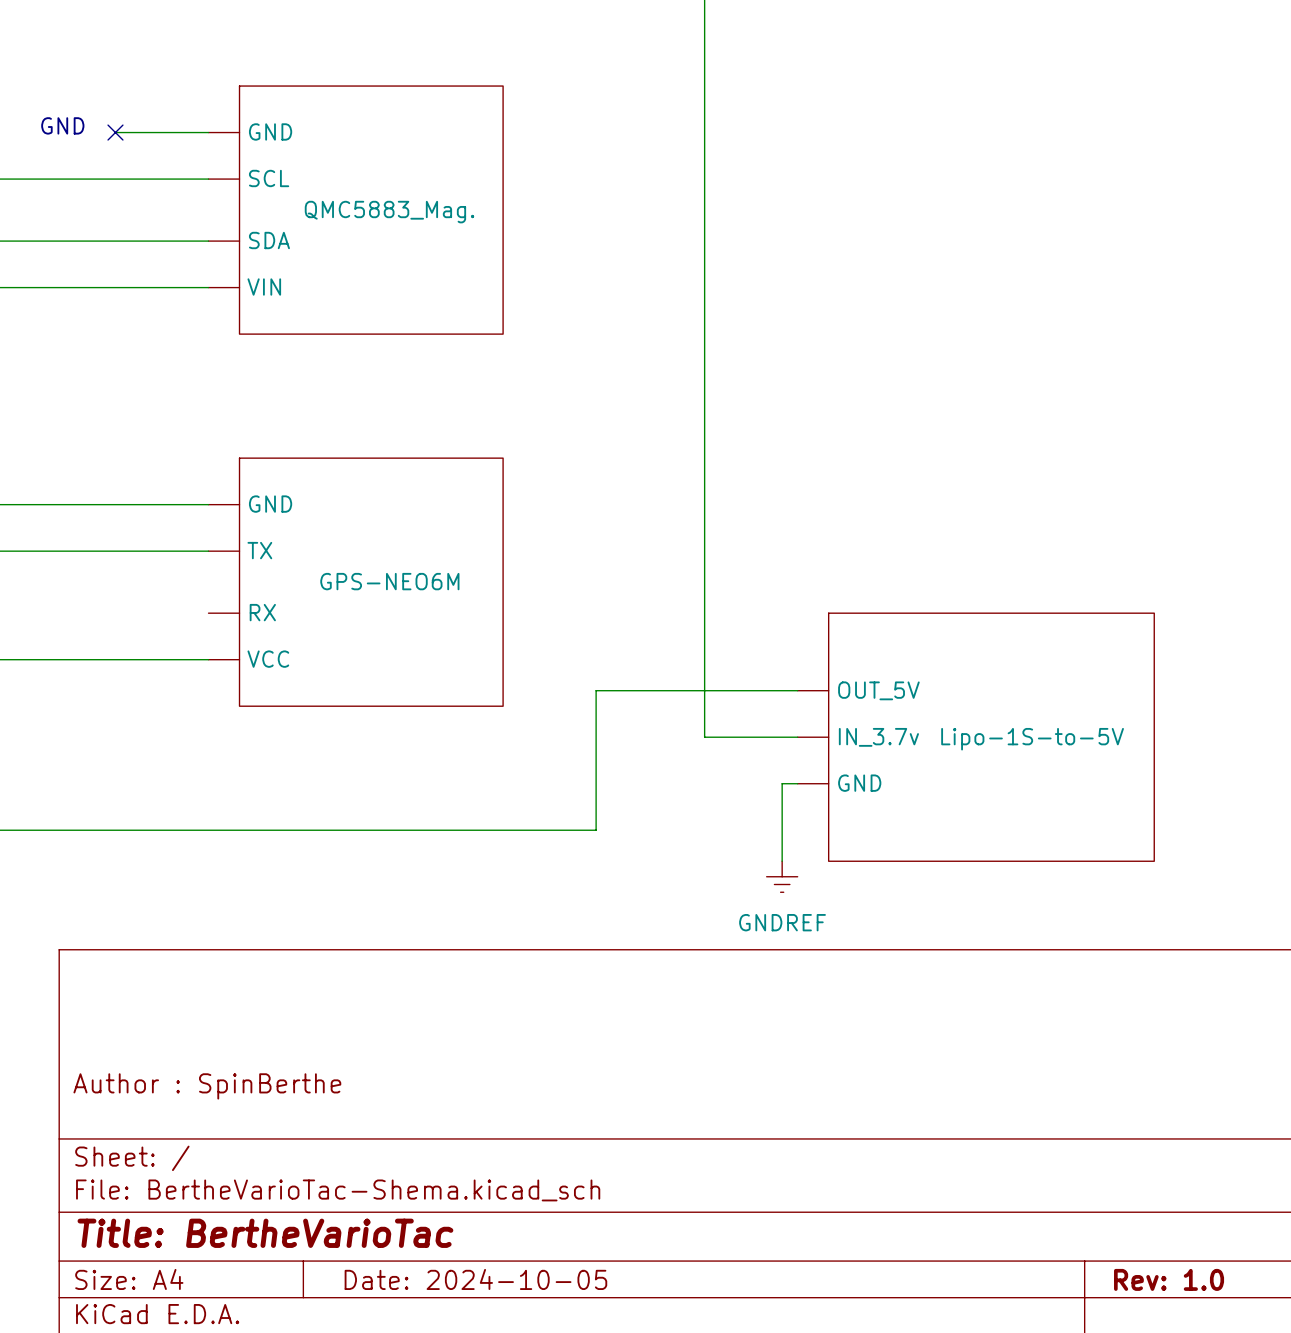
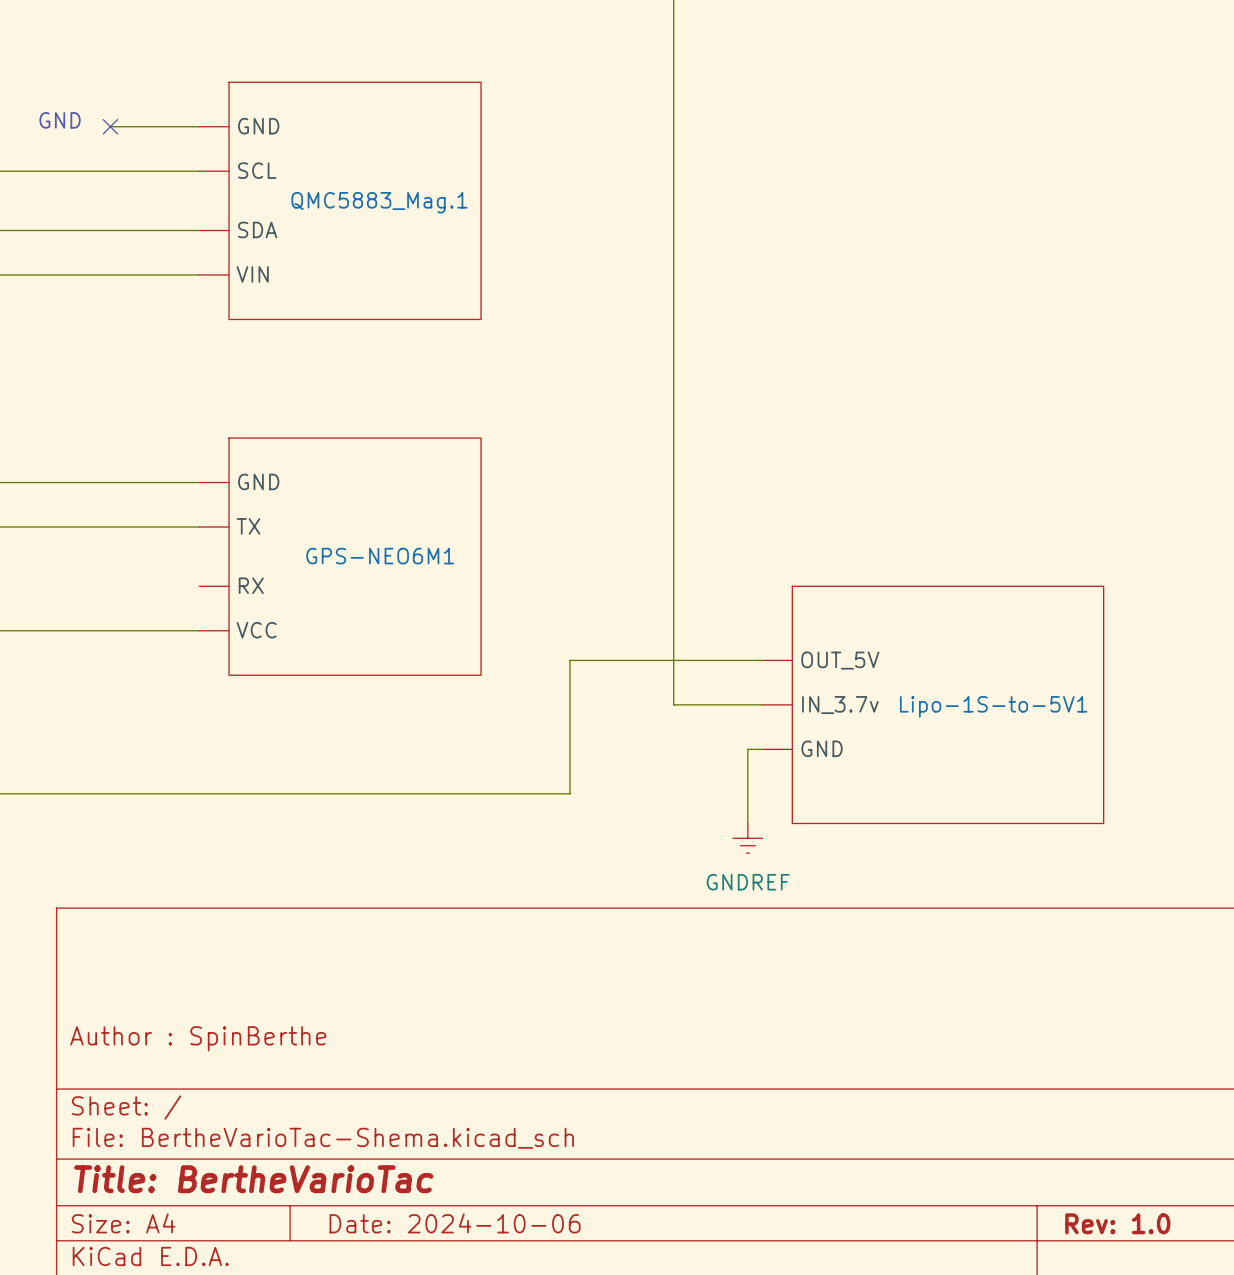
QMC5883_Mag. name: QMC5883_Mag. (389, 212) -> QMC5883_Mag.1 (379, 202)
GPS-NEO6M name: GPS-NEO6M (389, 581) -> GPS-NEO6M1 (380, 556)
Lipo-1S-to-5V name: Lipo-1S-to-5V (1032, 739) -> Lipo-1S-to-5V1 (993, 706)
title block: Date: 2024-10-05 (475, 1279) -> Date: 2024-10-06 (455, 1223)

